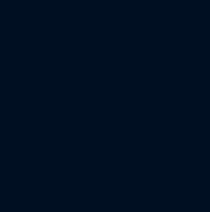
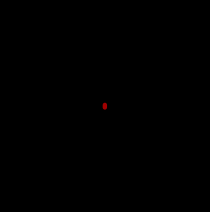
top track: none -> (104, 104) (104, 107)

